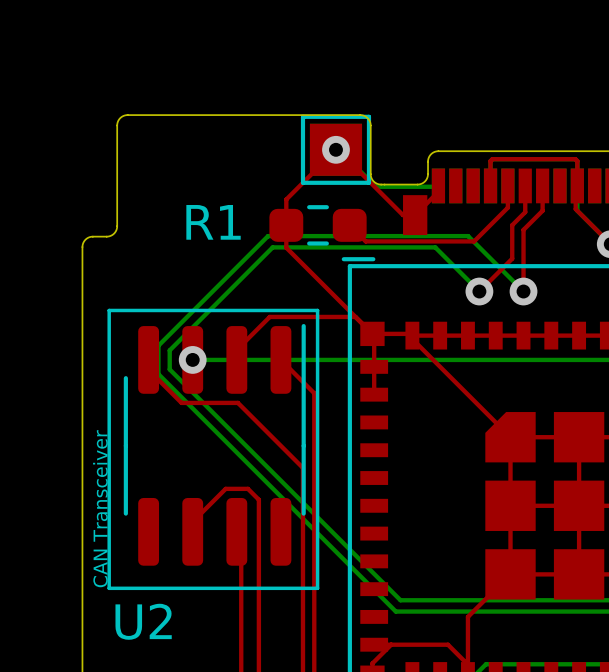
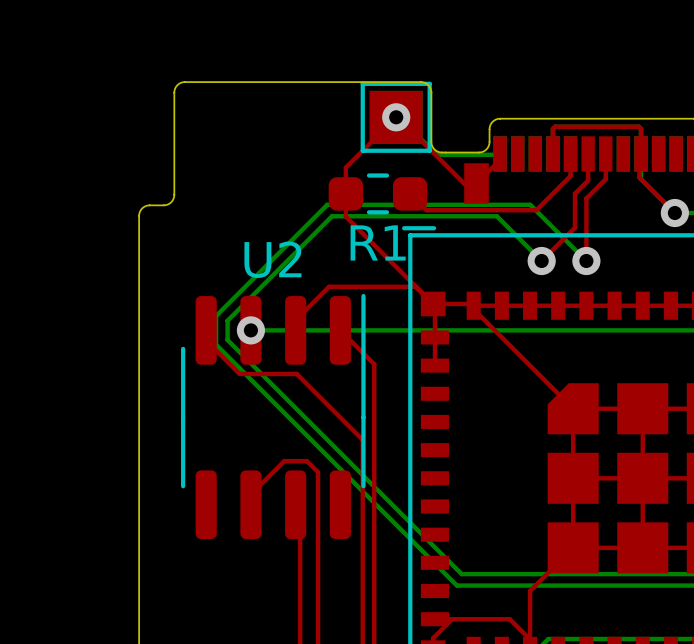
R1 name position: R1 (213, 222) -> R1 (378, 242)
line: (109, 310) (317, 310) (317, 588) (109, 588) (109, 310) -> none
text: CAN Transceiver (100, 508) -> none
U2 name position: U2 (143, 621) -> U2 (272, 259)

